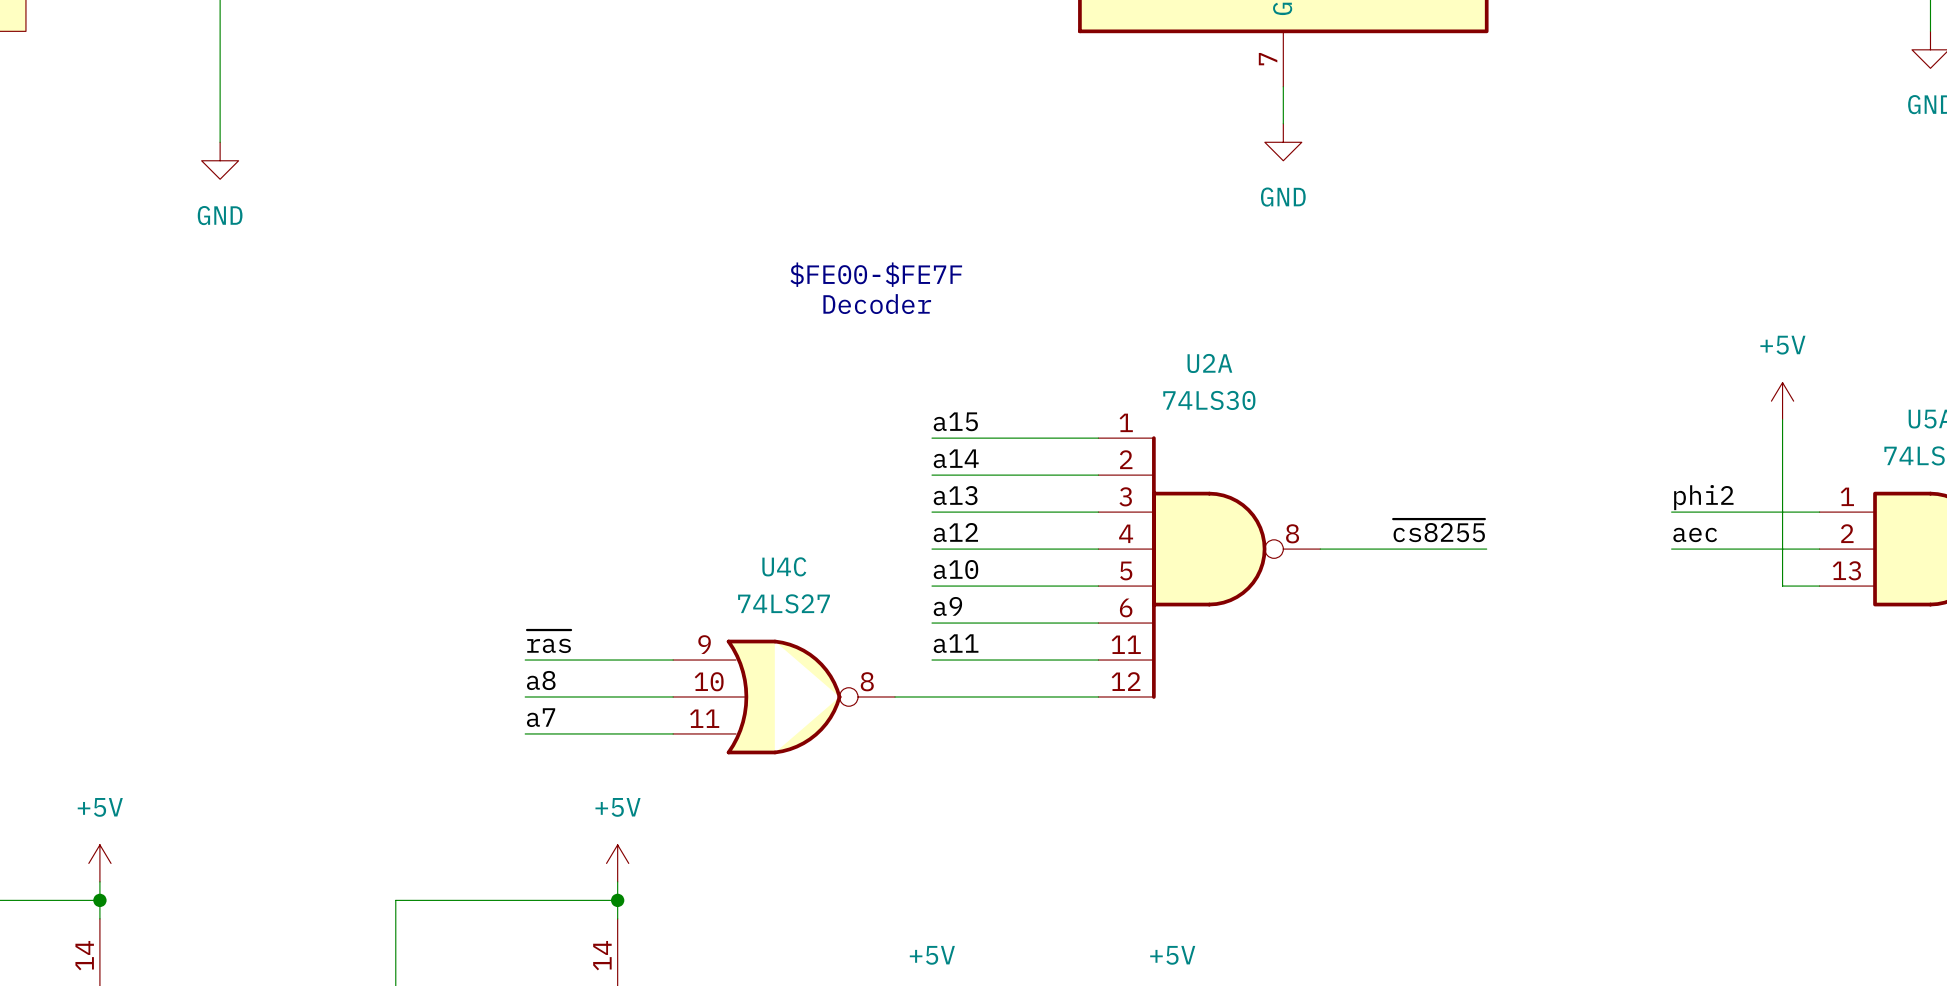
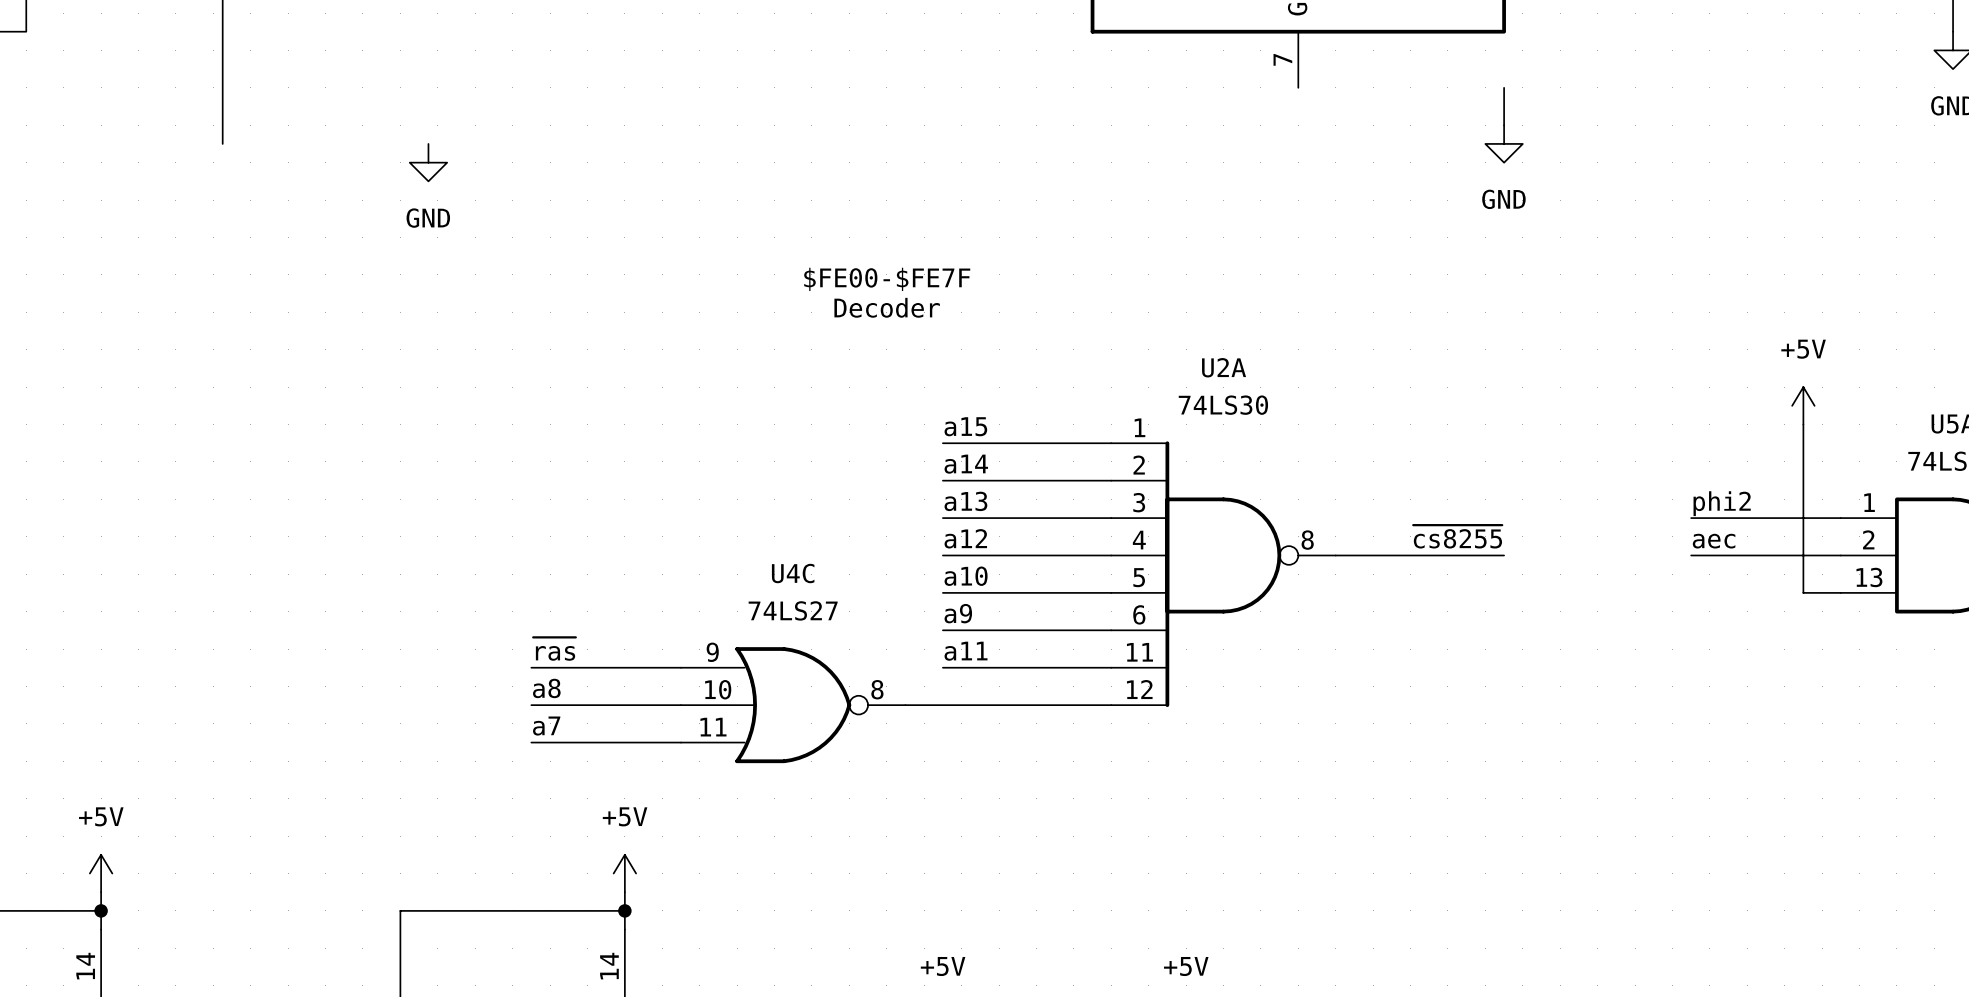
wire: (1283, 86) (1283, 123) -> (1504, 87) (1504, 125)
power symbol position: GND (1283, 142) -> GND (1504, 143)
power symbol position: GND (220, 160) -> GND (428, 162)

